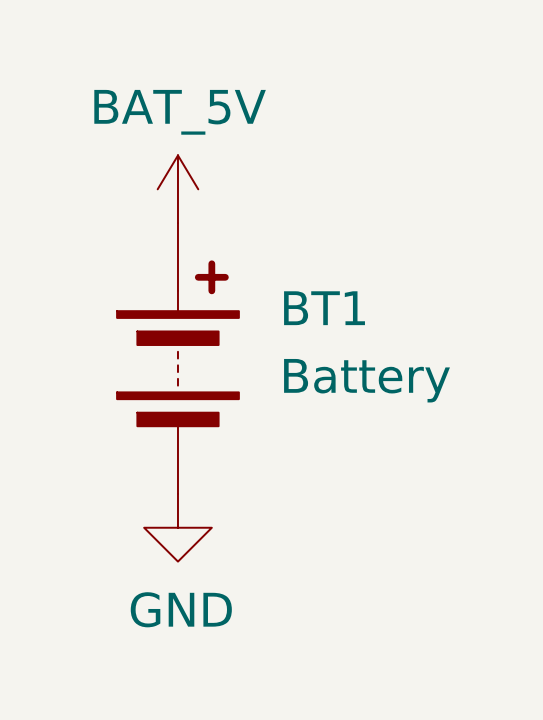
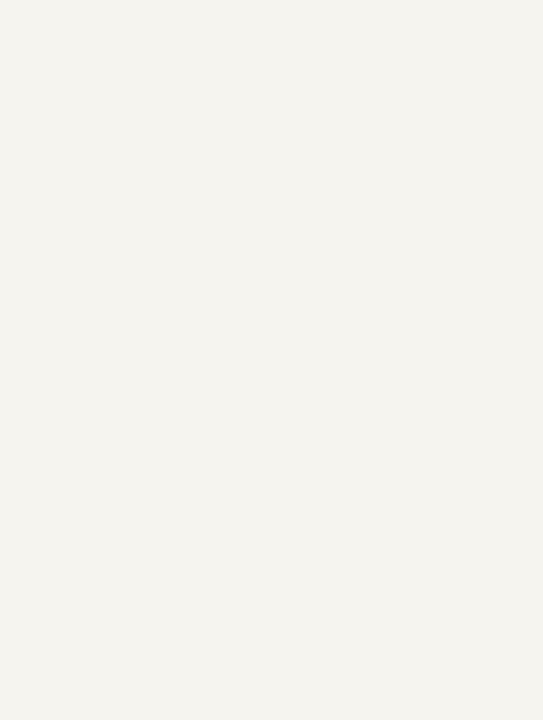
power symbol: BAT_5V (177, 189) -> none
BT1: Battery (177, 358) -> none
power symbol: GND (177, 527) -> none

